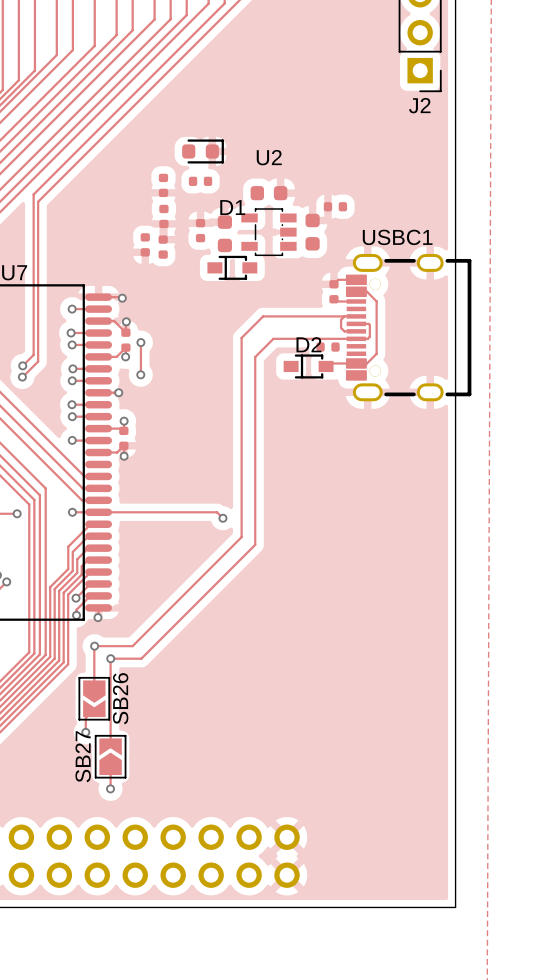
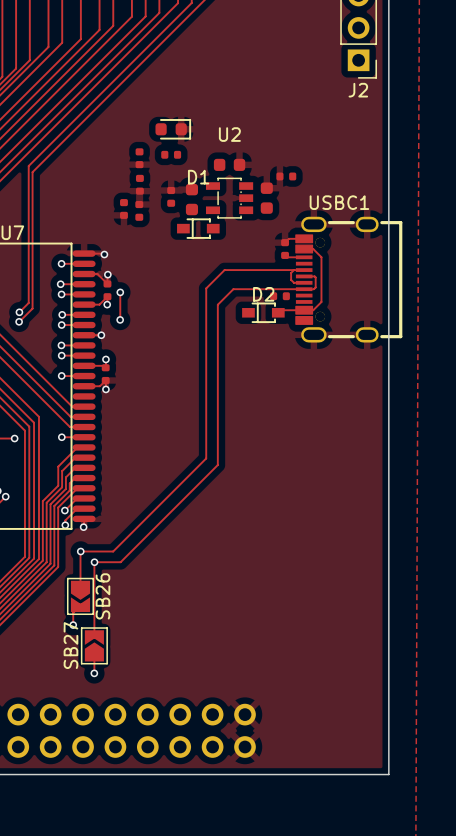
track: (98, 512) (216, 512) (222, 518) -> none
via: (222, 518) -> none

